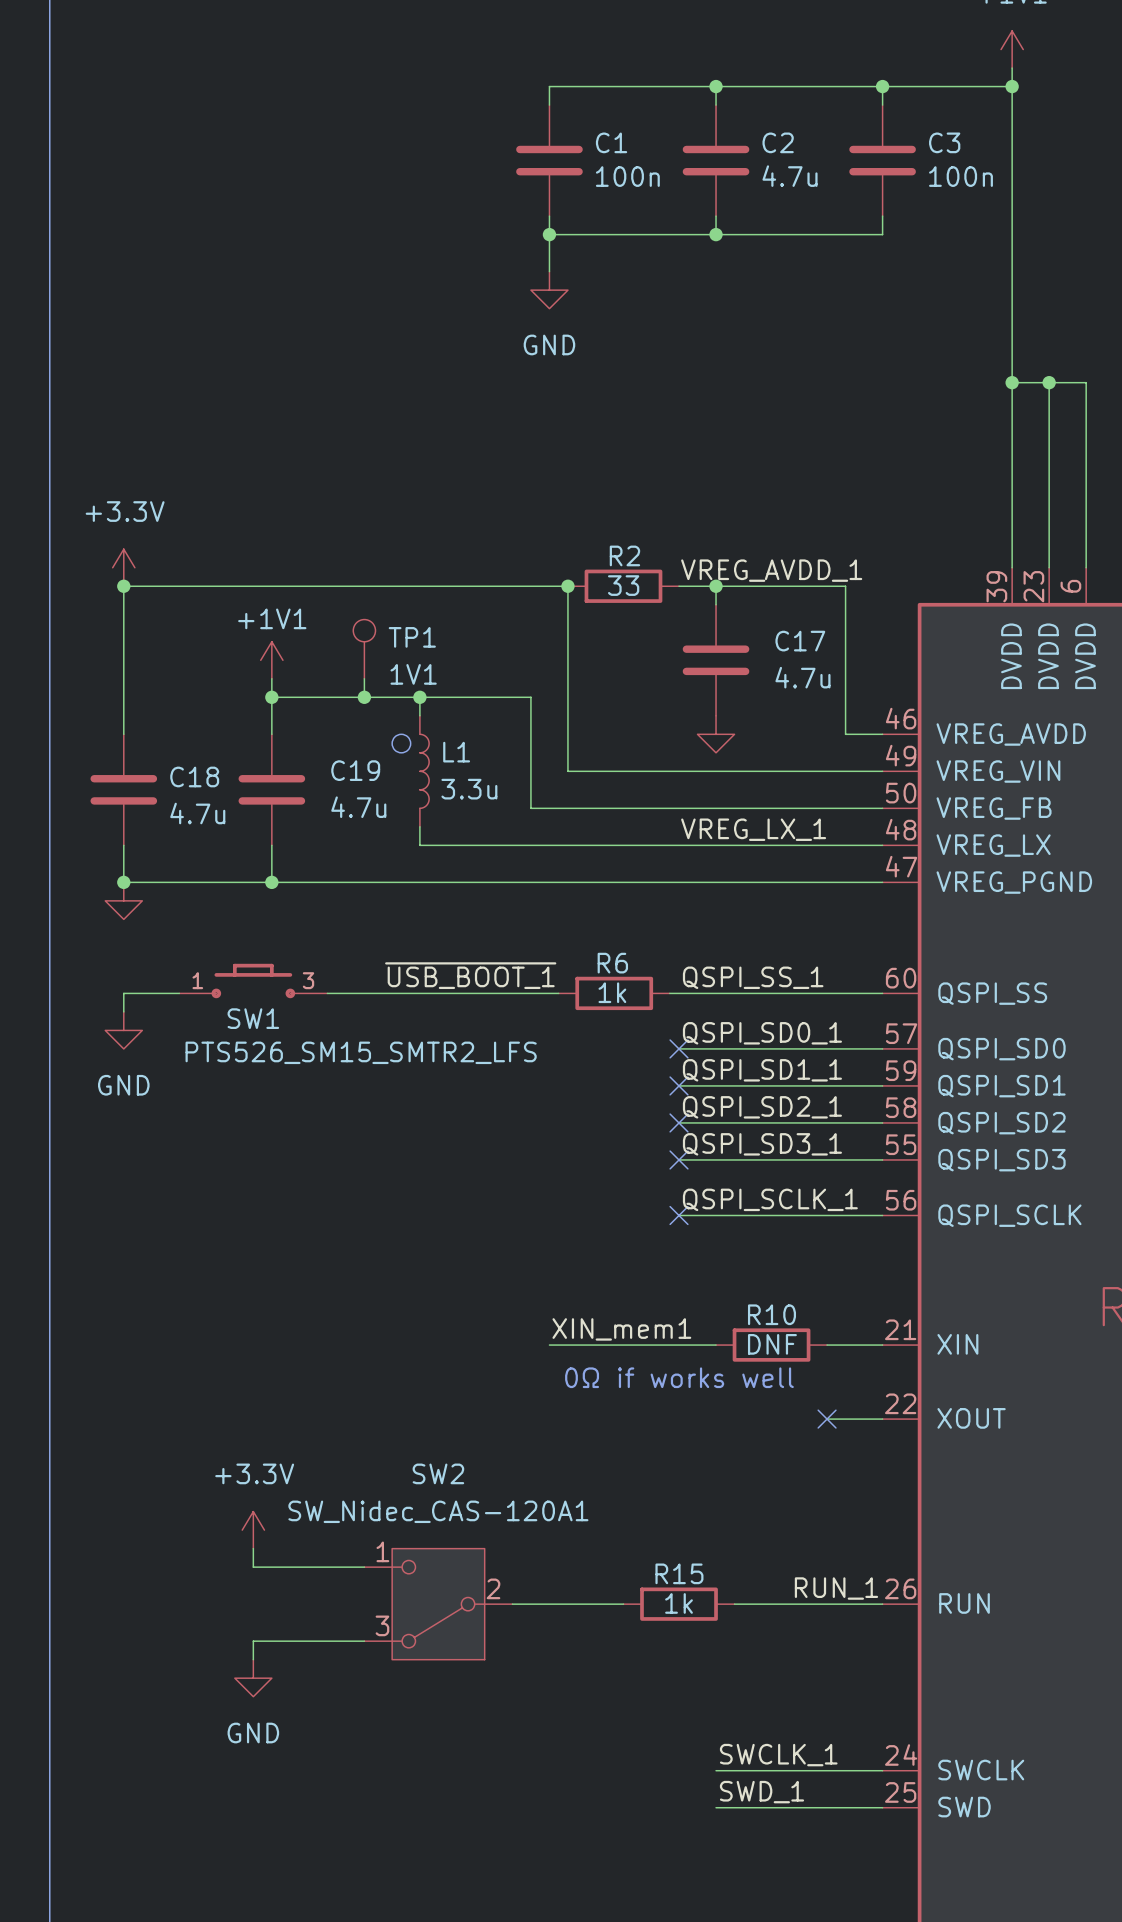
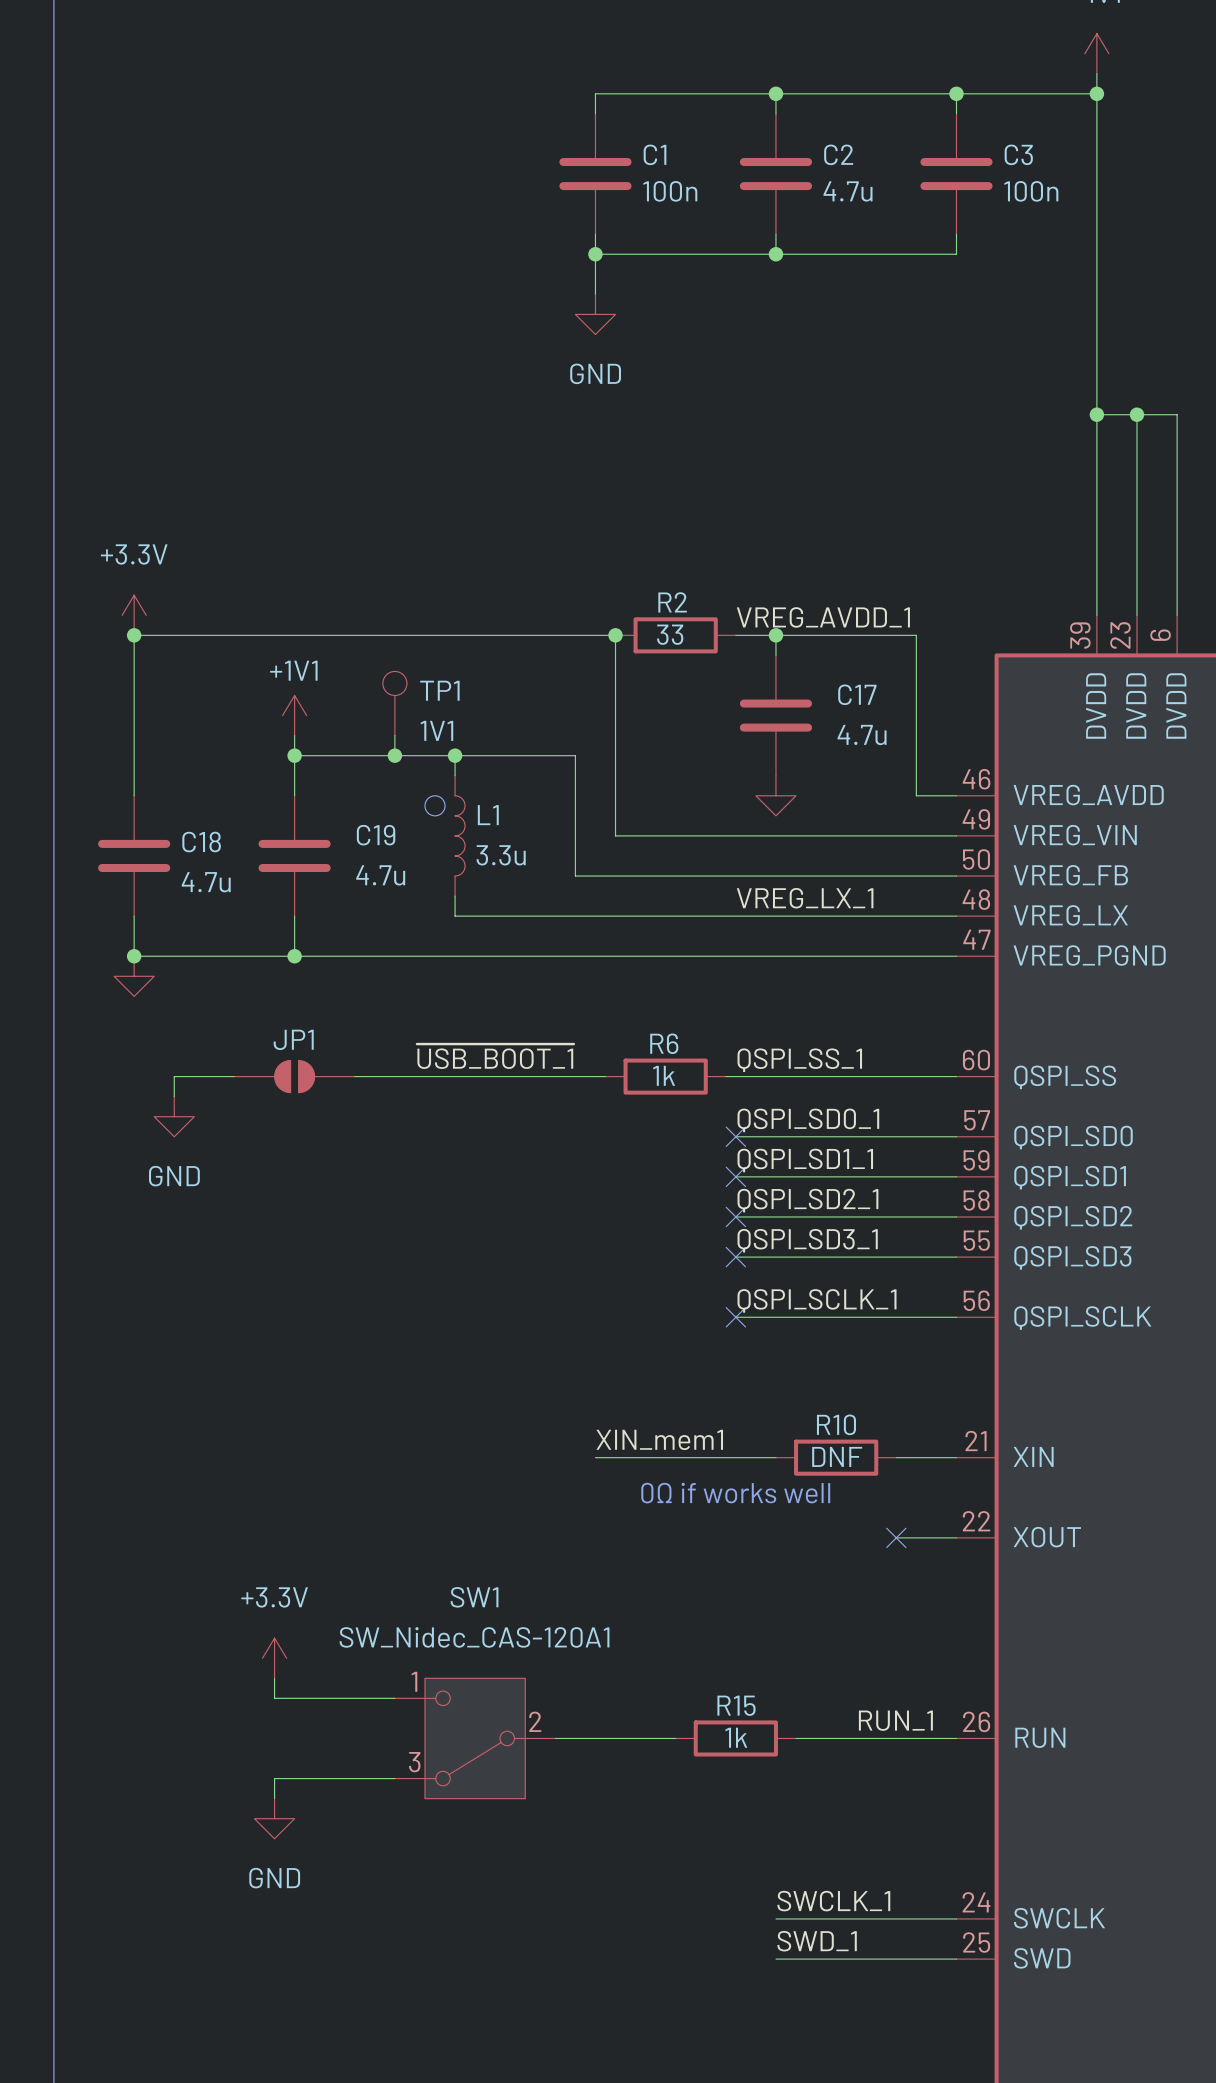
SW1: PTS526_SM15_SMTR2_LFS (253, 981) -> none
wire: (160, 993) (123, 993) (123, 1011) -> (174, 1076) (174, 1096)
JP1: none -> (294, 1076)
power symbol position: GND (123, 1030) -> GND (174, 1116)
SW2 name: SW2 (438, 1473) -> SW1 (474, 1597)

